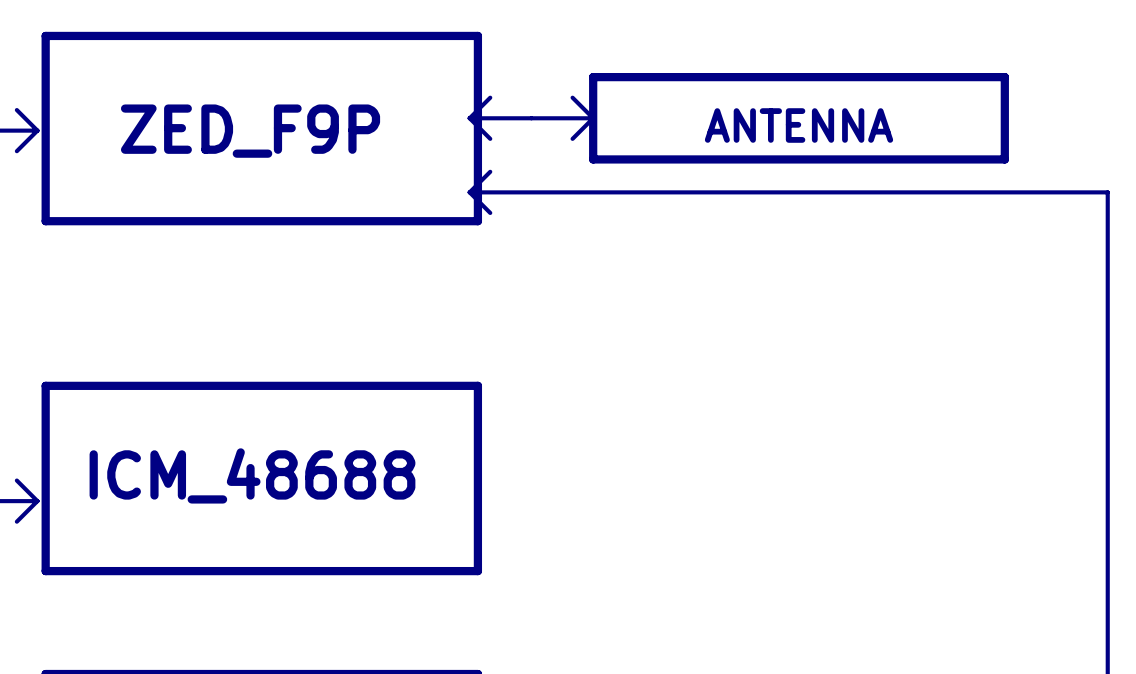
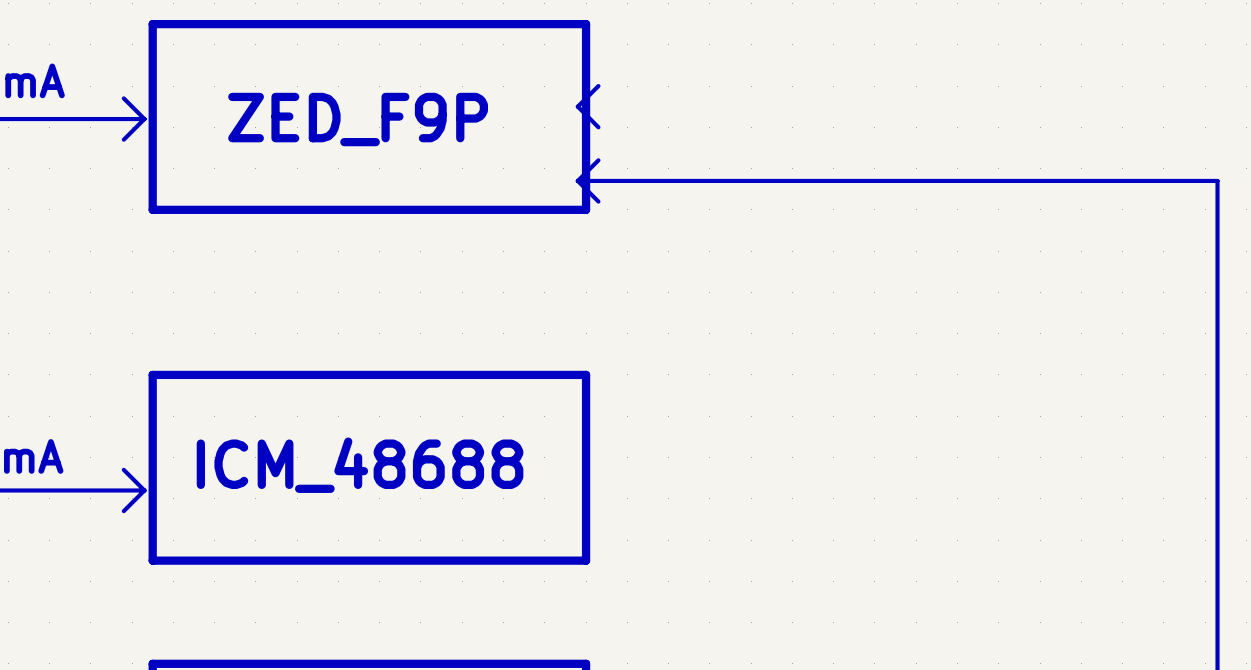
line: (593, 77) (593, 159) (1004, 159) (1004, 77) (593, 77) -> none
line: (572, 97) (593, 118) -> none
line: (469, 118) (593, 118) -> none
line: (593, 118) (572, 138) -> none
text: ANTENNA (799, 125) -> none

